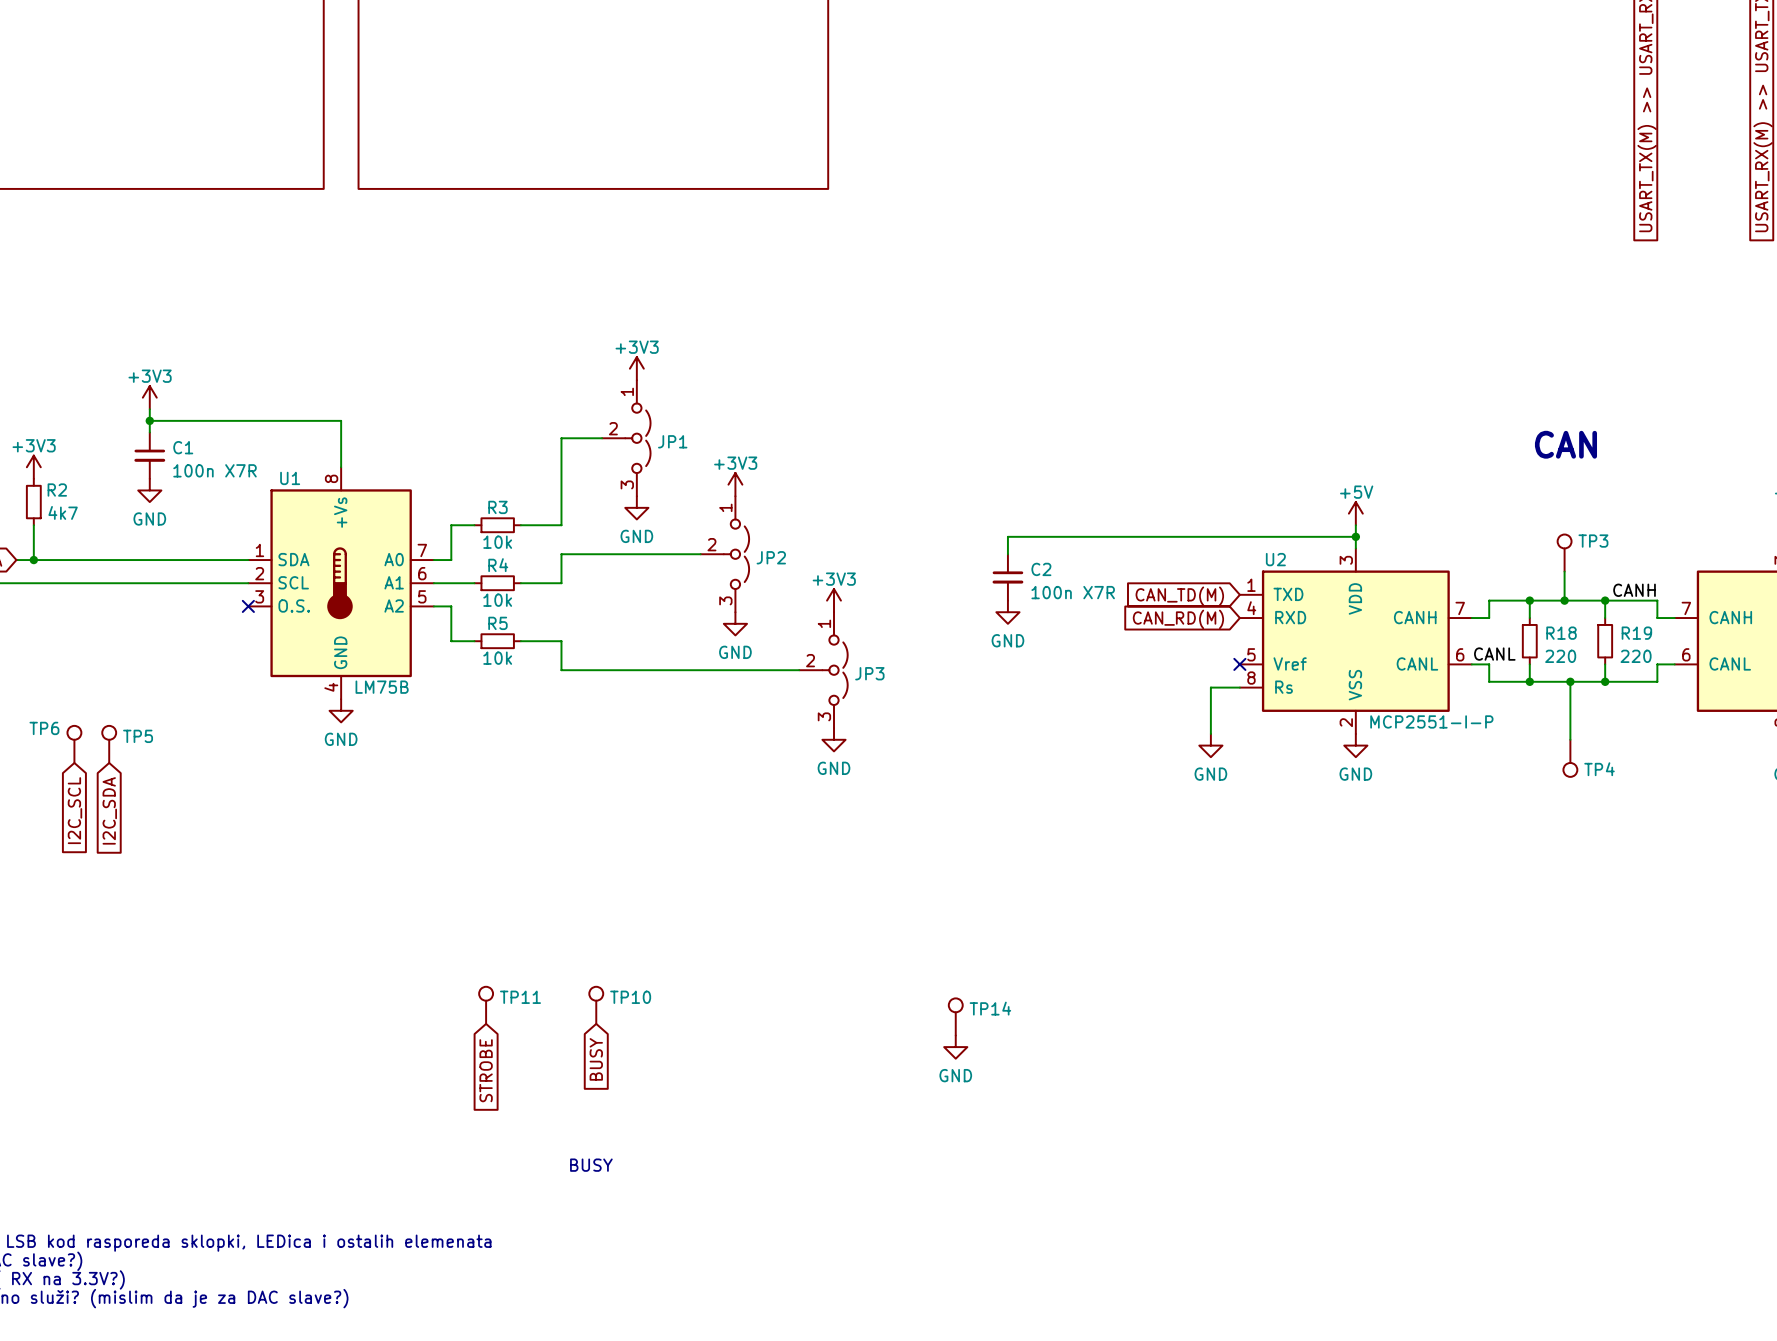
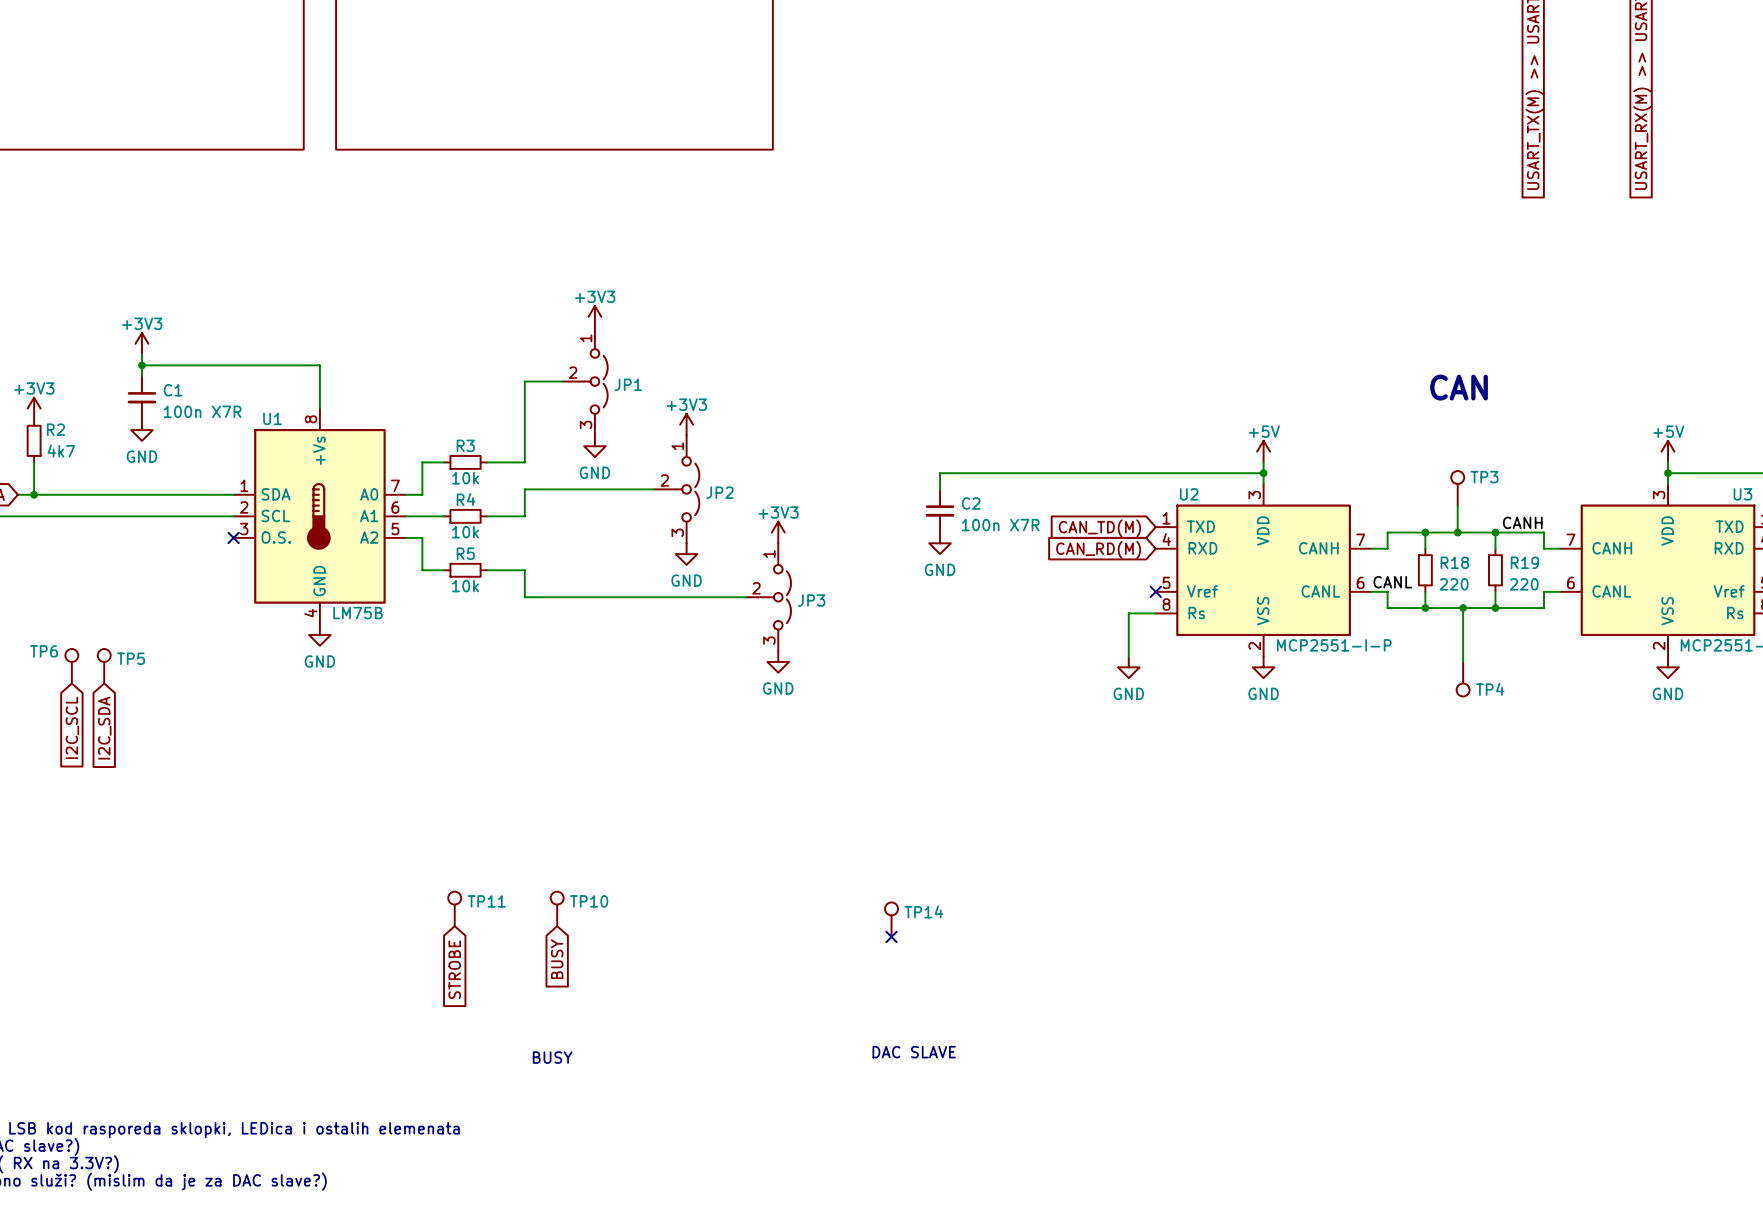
no-connect mark: none -> (891, 936)
power symbol: GND (955, 1047) -> none
text: none -> DAC SLAVE (914, 1052)

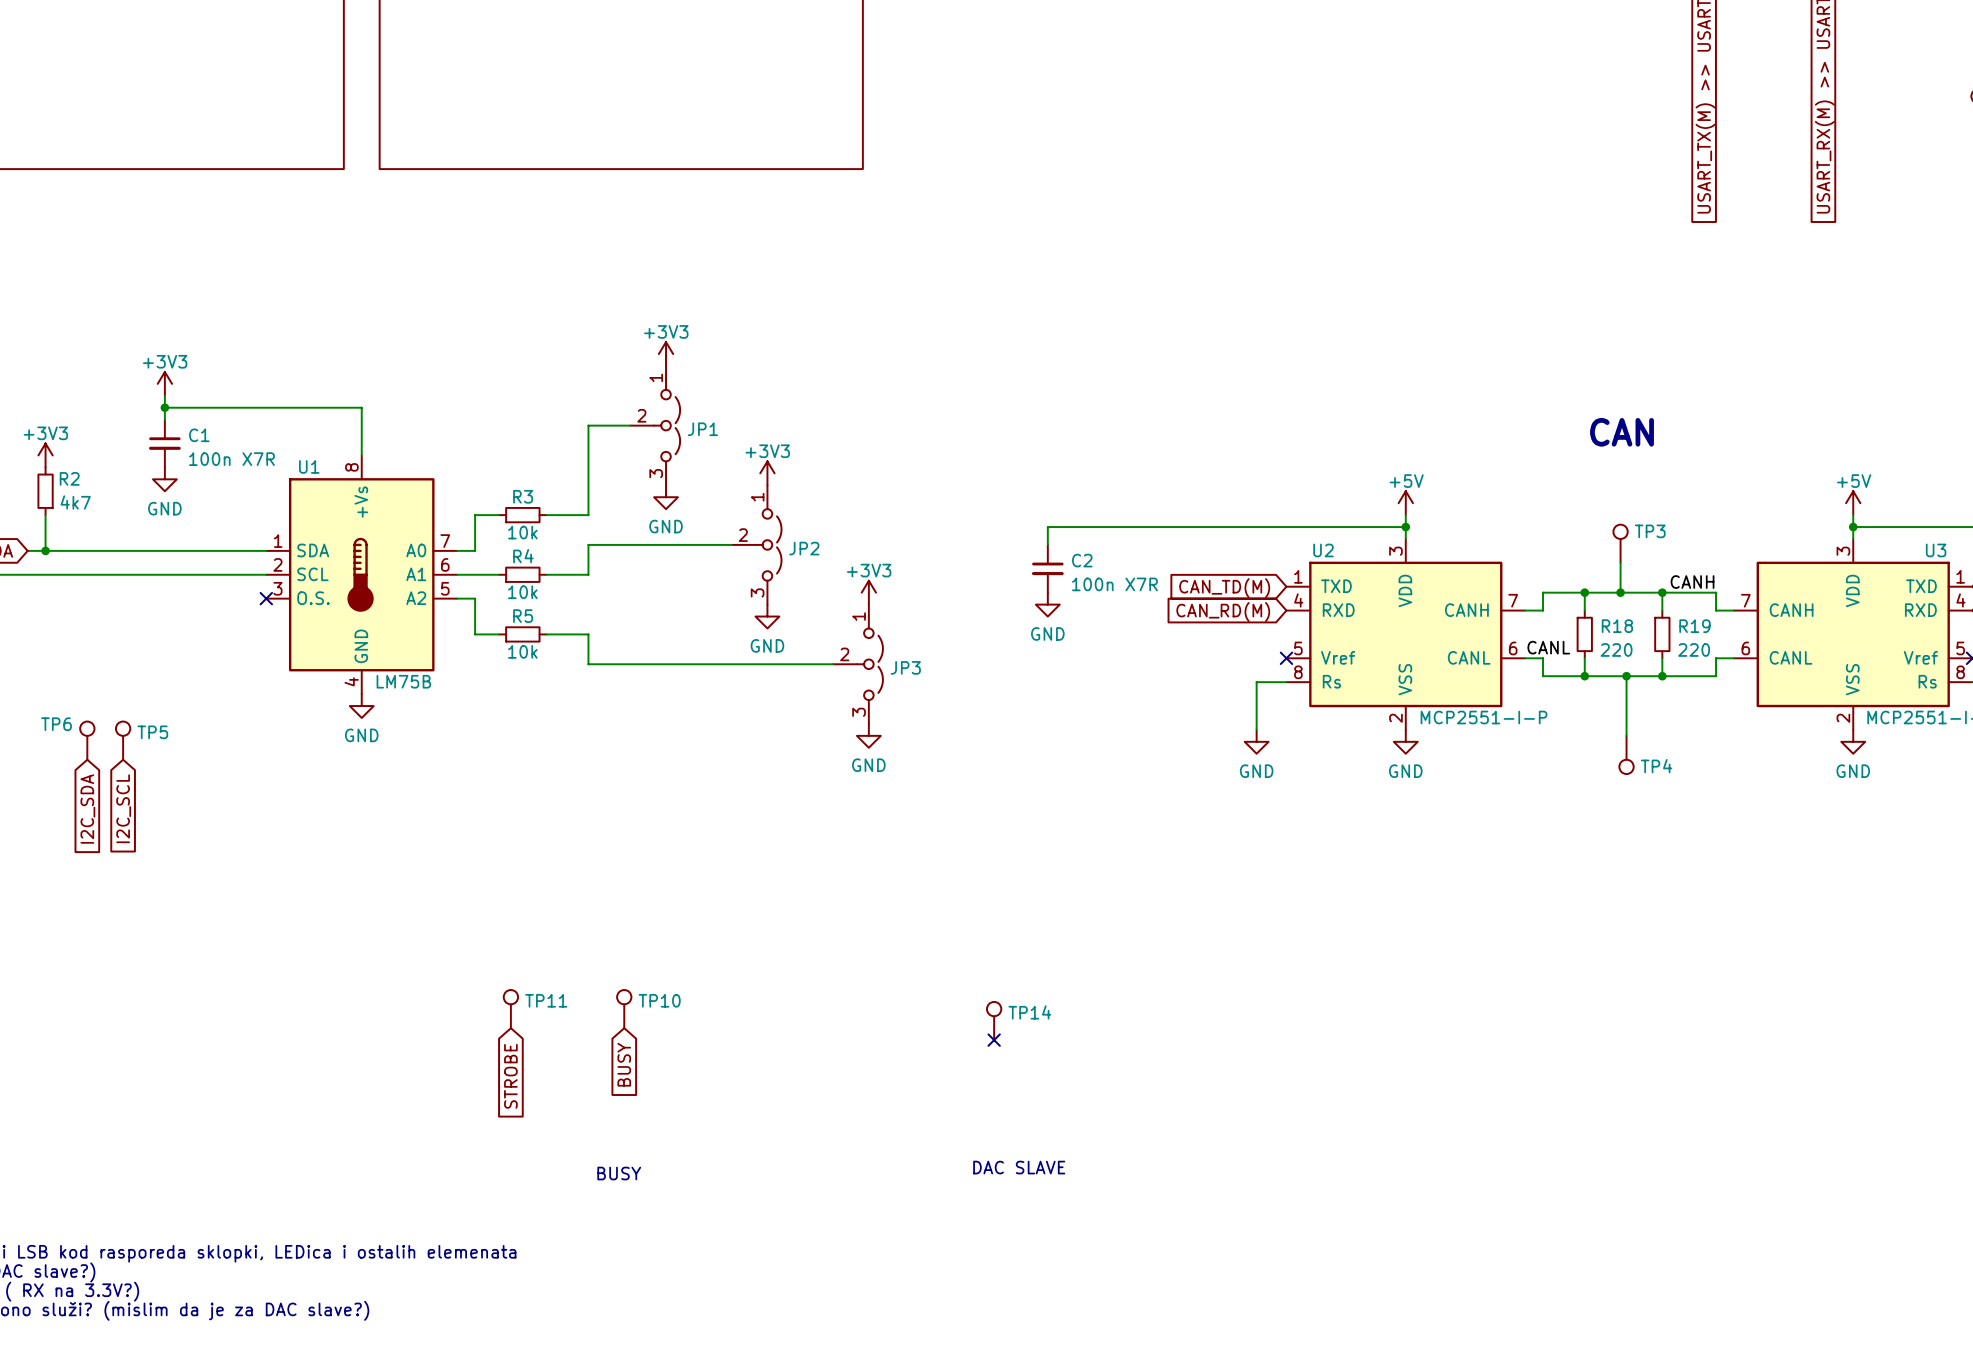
global label: I2C_SCL (72, 727) -> I2C_SDA (87, 809)
global label: I2C_SDA (104, 728) -> I2C_SCL (123, 808)

